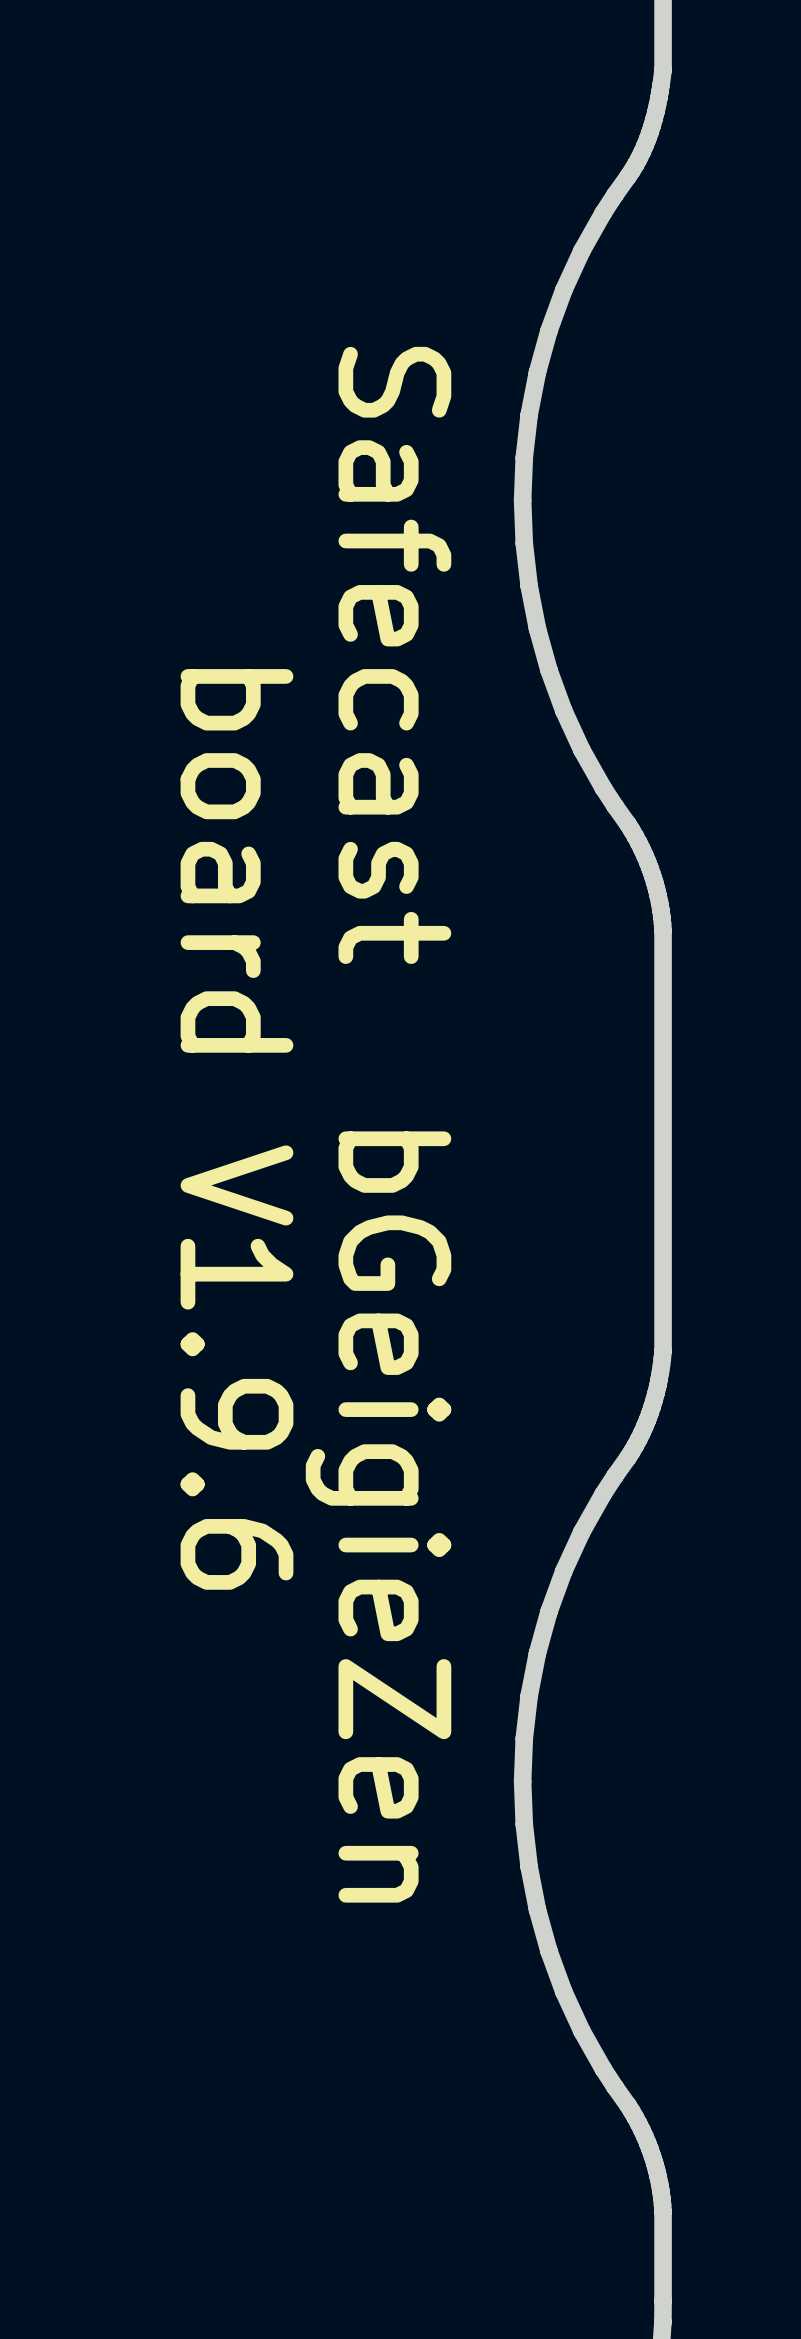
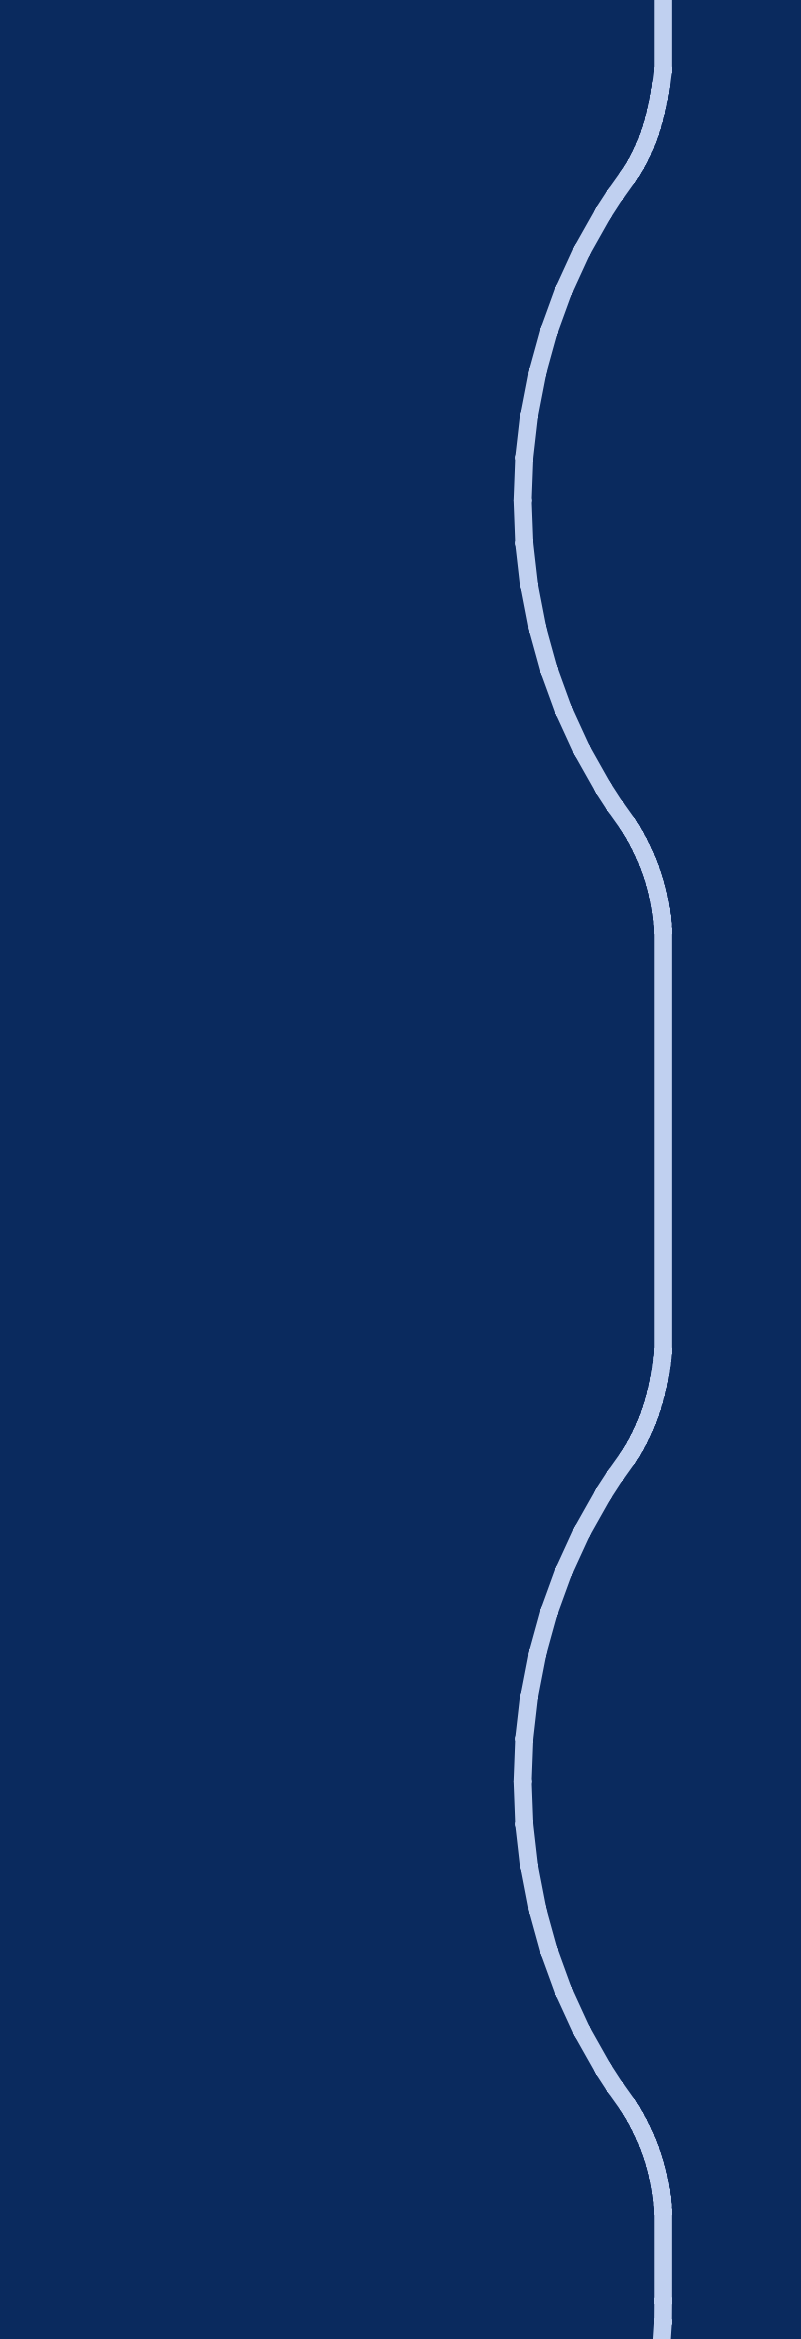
text: Safecast bGeigieZen (378, 1124) -> none
text: board V1.9.6 (236, 1129) -> none

